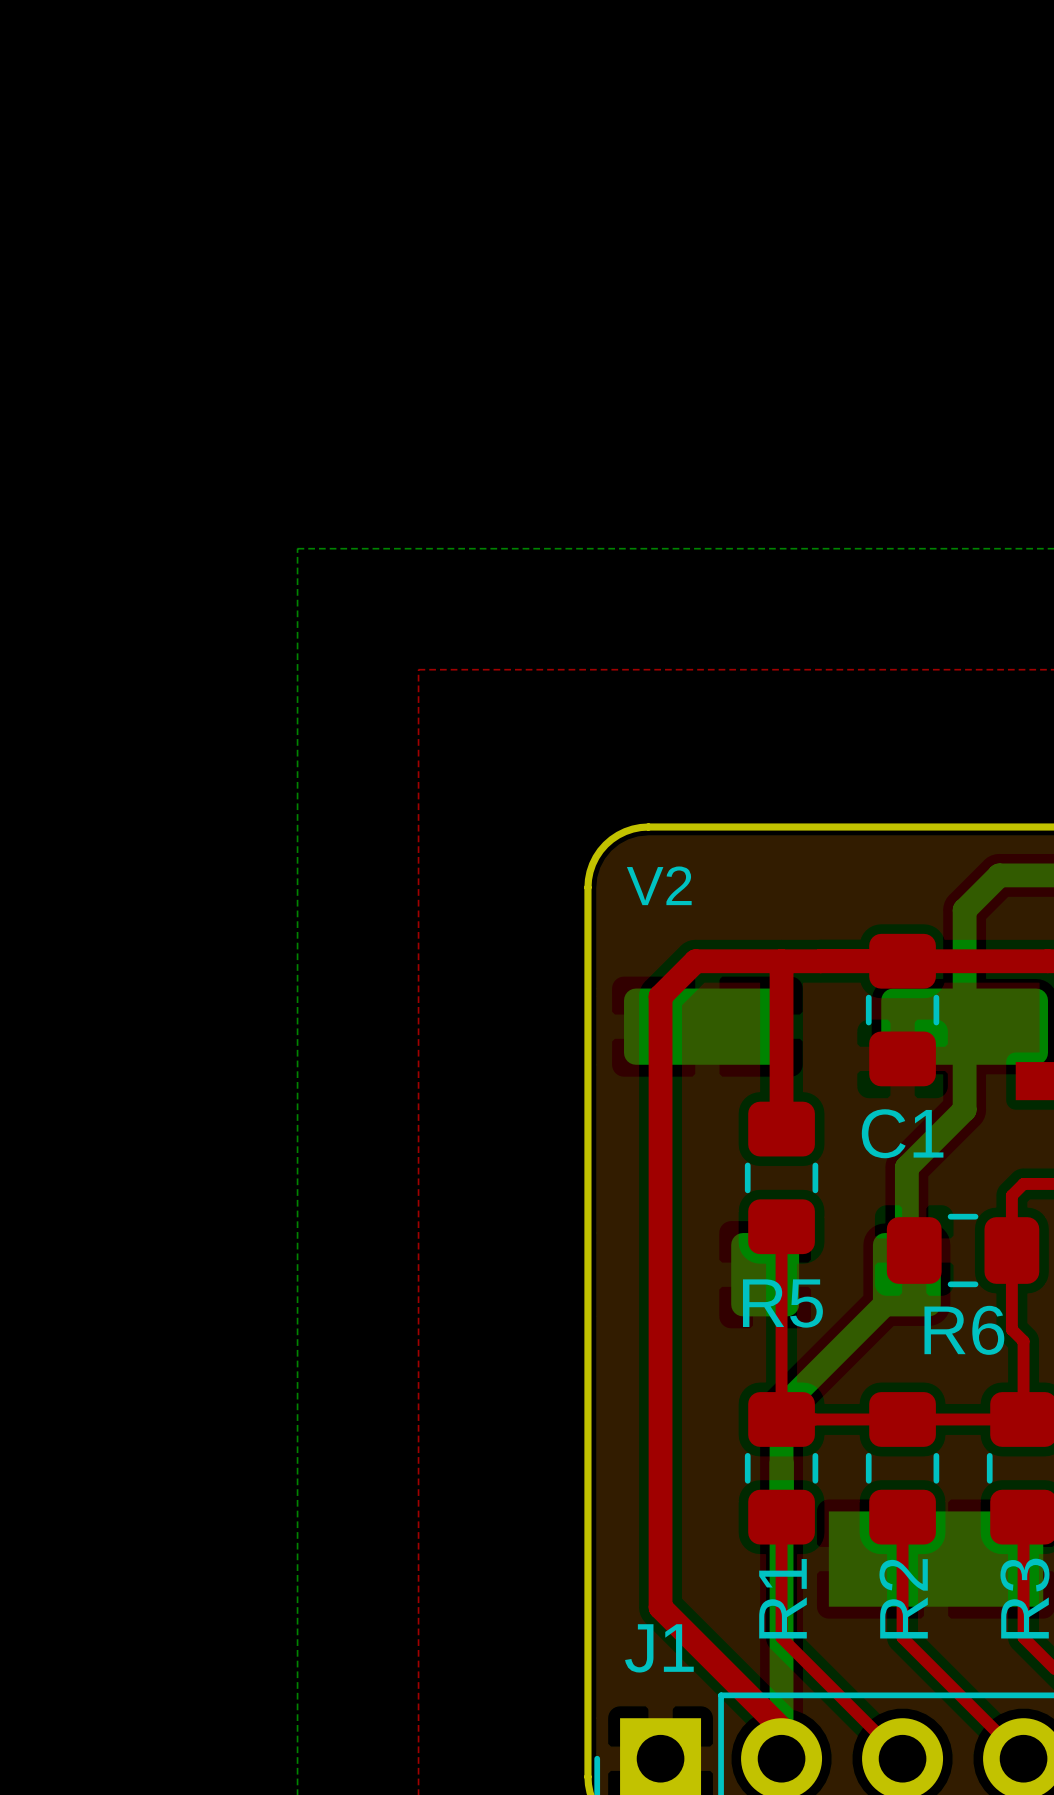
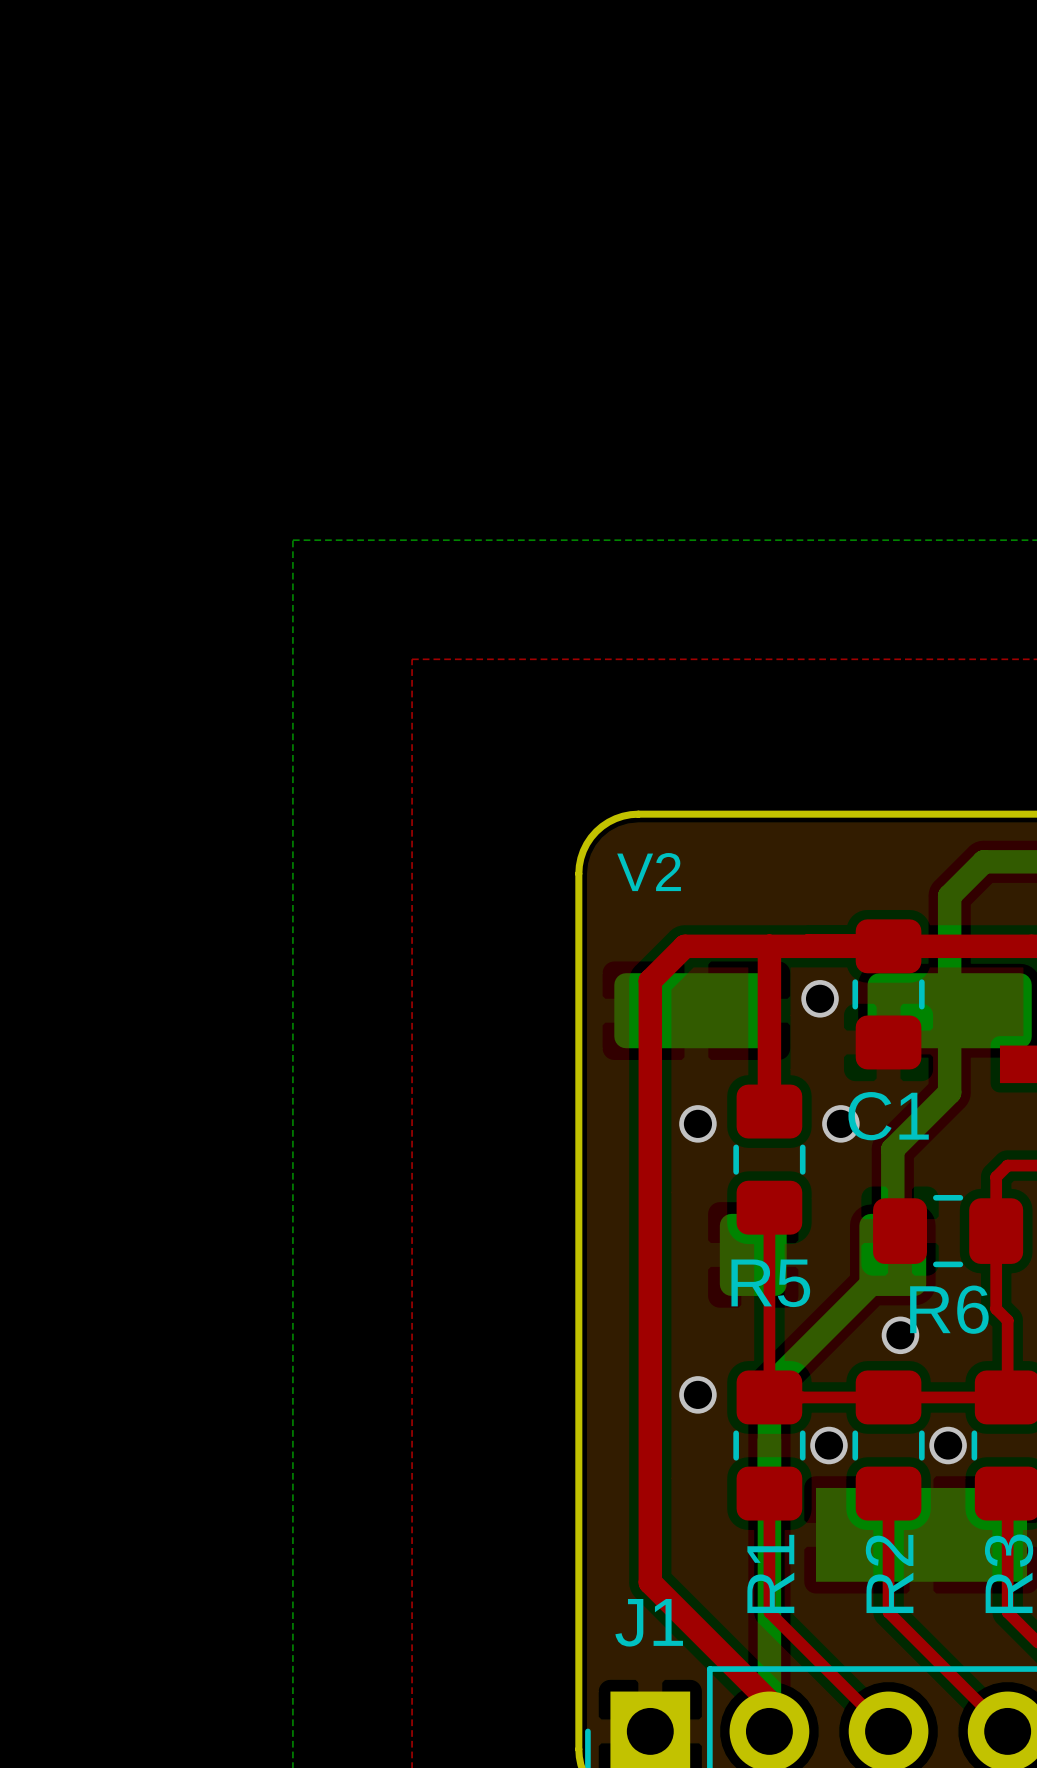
via: none -> (820, 998)
via: none -> (697, 1123)
via: none -> (840, 1123)
via: none -> (900, 1335)
via: none -> (697, 1394)
via: none -> (828, 1445)
via: none -> (948, 1445)

